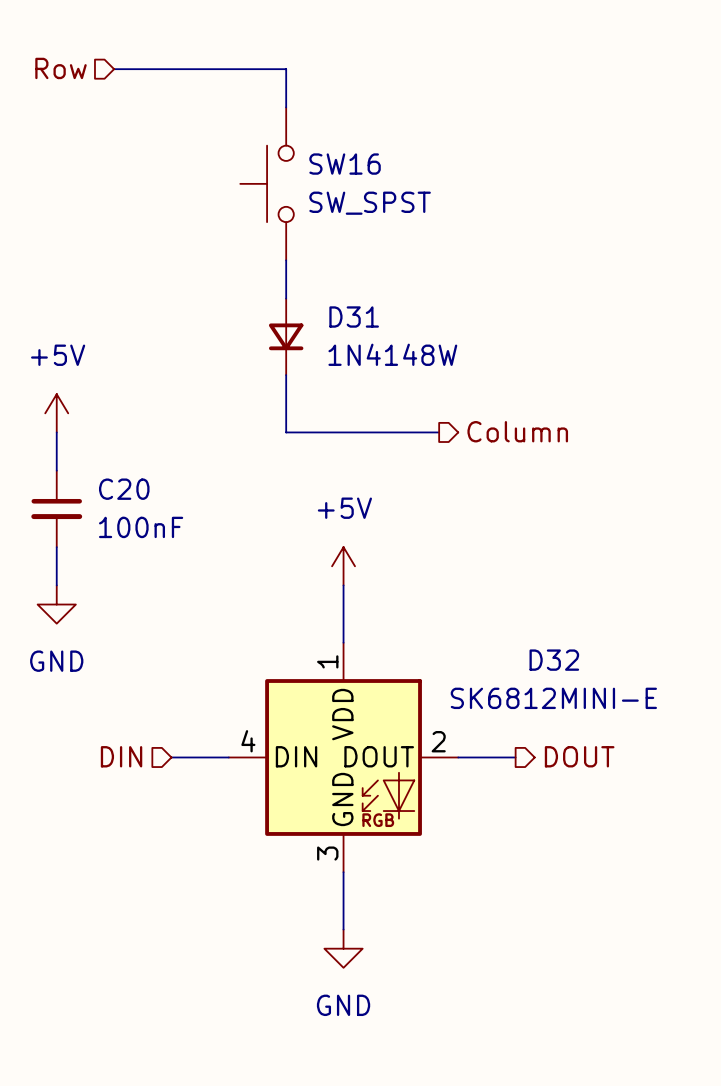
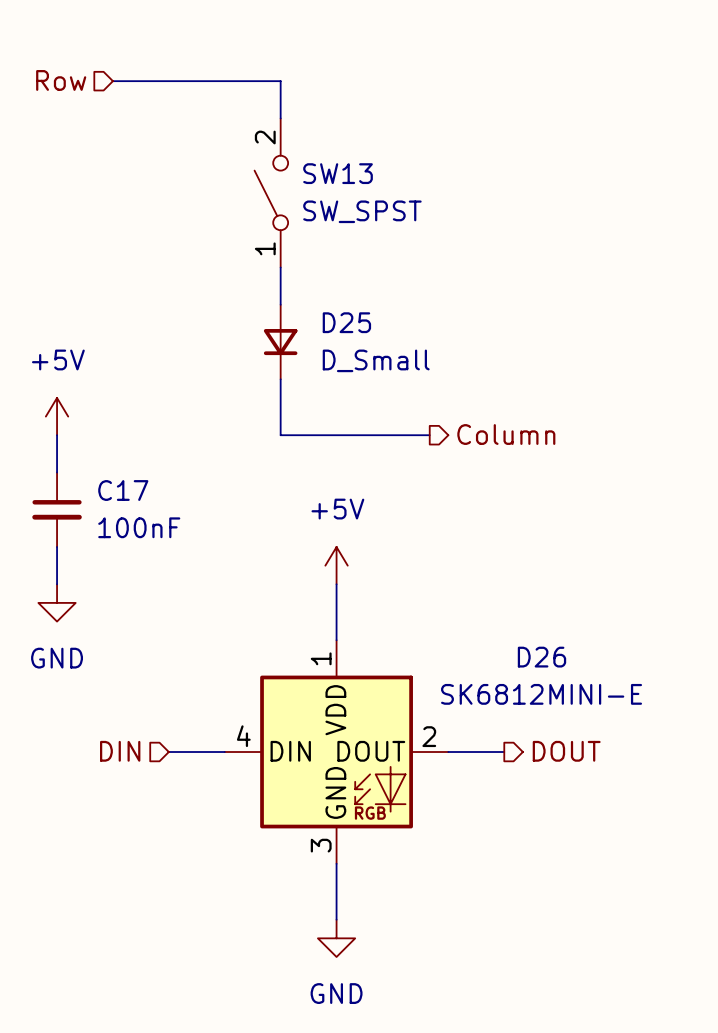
SW16: SW_SPST (267, 183) -> none
SW13: none -> SW_SPST (271, 192)
D31 name: D31 (354, 317) -> D25 (346, 322)
D31 value: 1N4148W (392, 354) -> D_Small (376, 360)
C20 name: C20 (124, 489) -> C17 (123, 490)
D32 name: D32 (554, 660) -> D26 (541, 657)

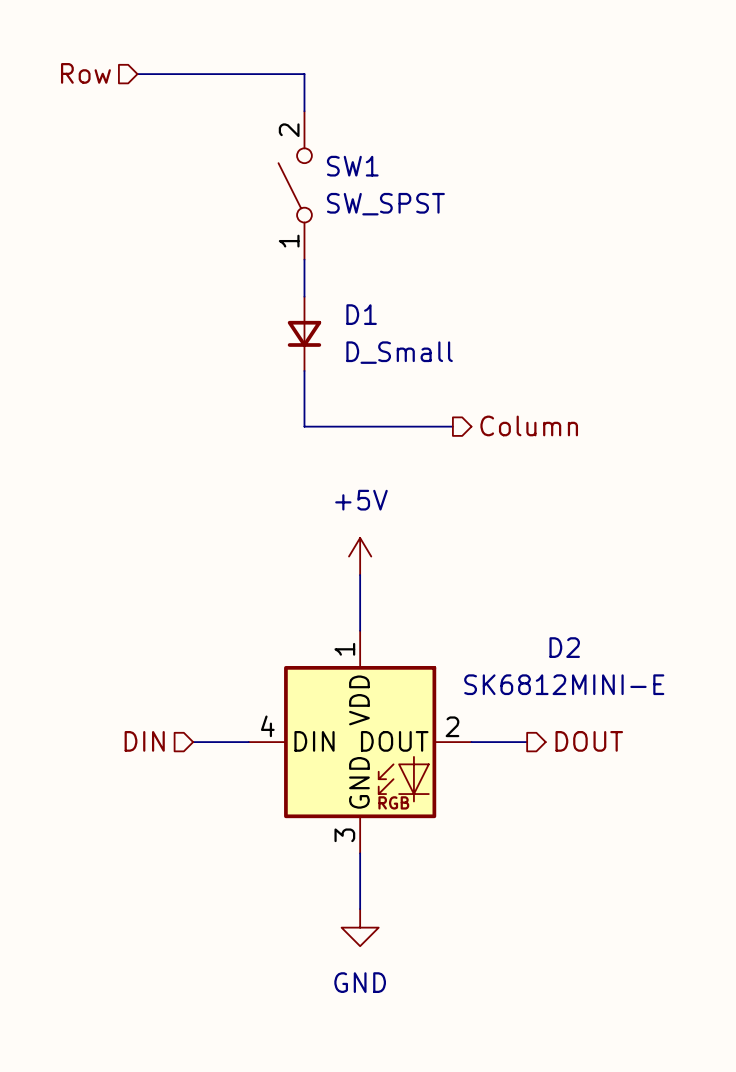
SW13 name: SW13 (338, 173) -> SW1 (352, 166)
D25 name: D25 (346, 322) -> D1 (361, 314)
power symbol: +5V (57, 416) -> none
wire: (57, 435) (57, 472) -> none
C17: 100nF (57, 509) -> none
wire: (57, 547) (57, 584) -> none
power symbol: GND (57, 602) -> none
D26 name: D26 (541, 657) -> D2 (564, 647)

